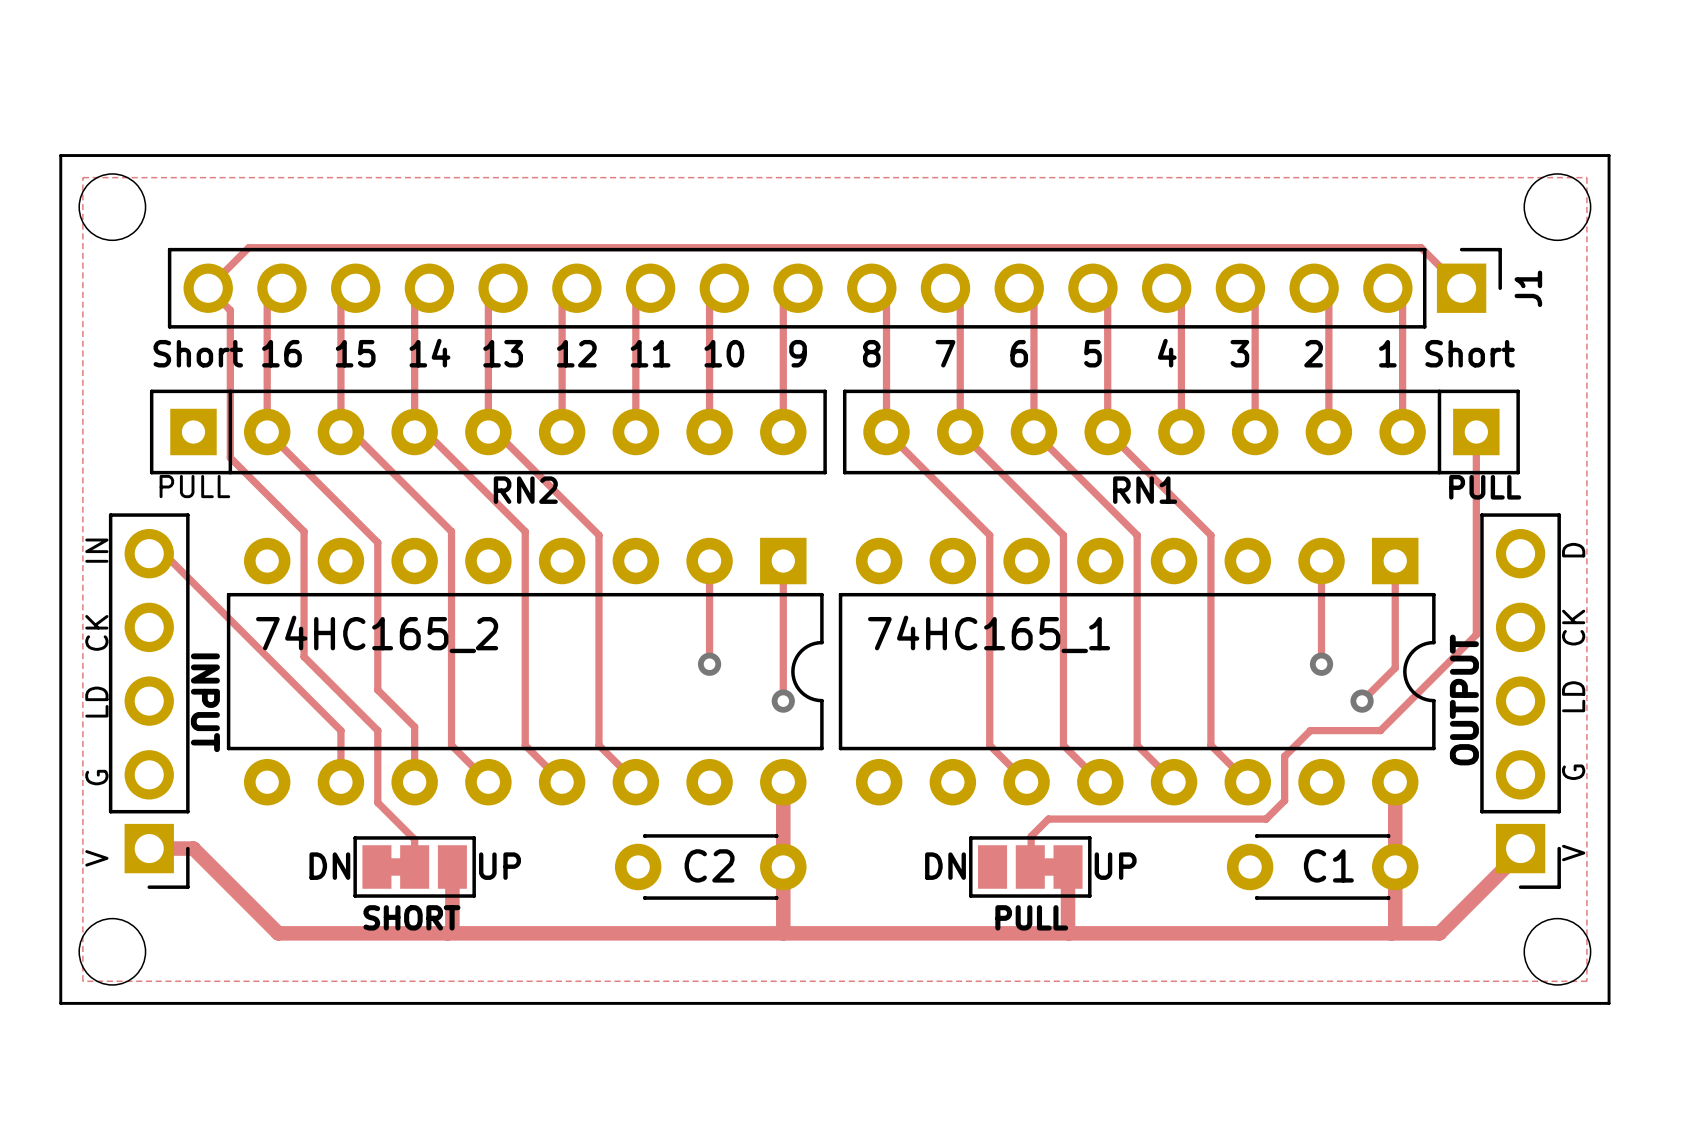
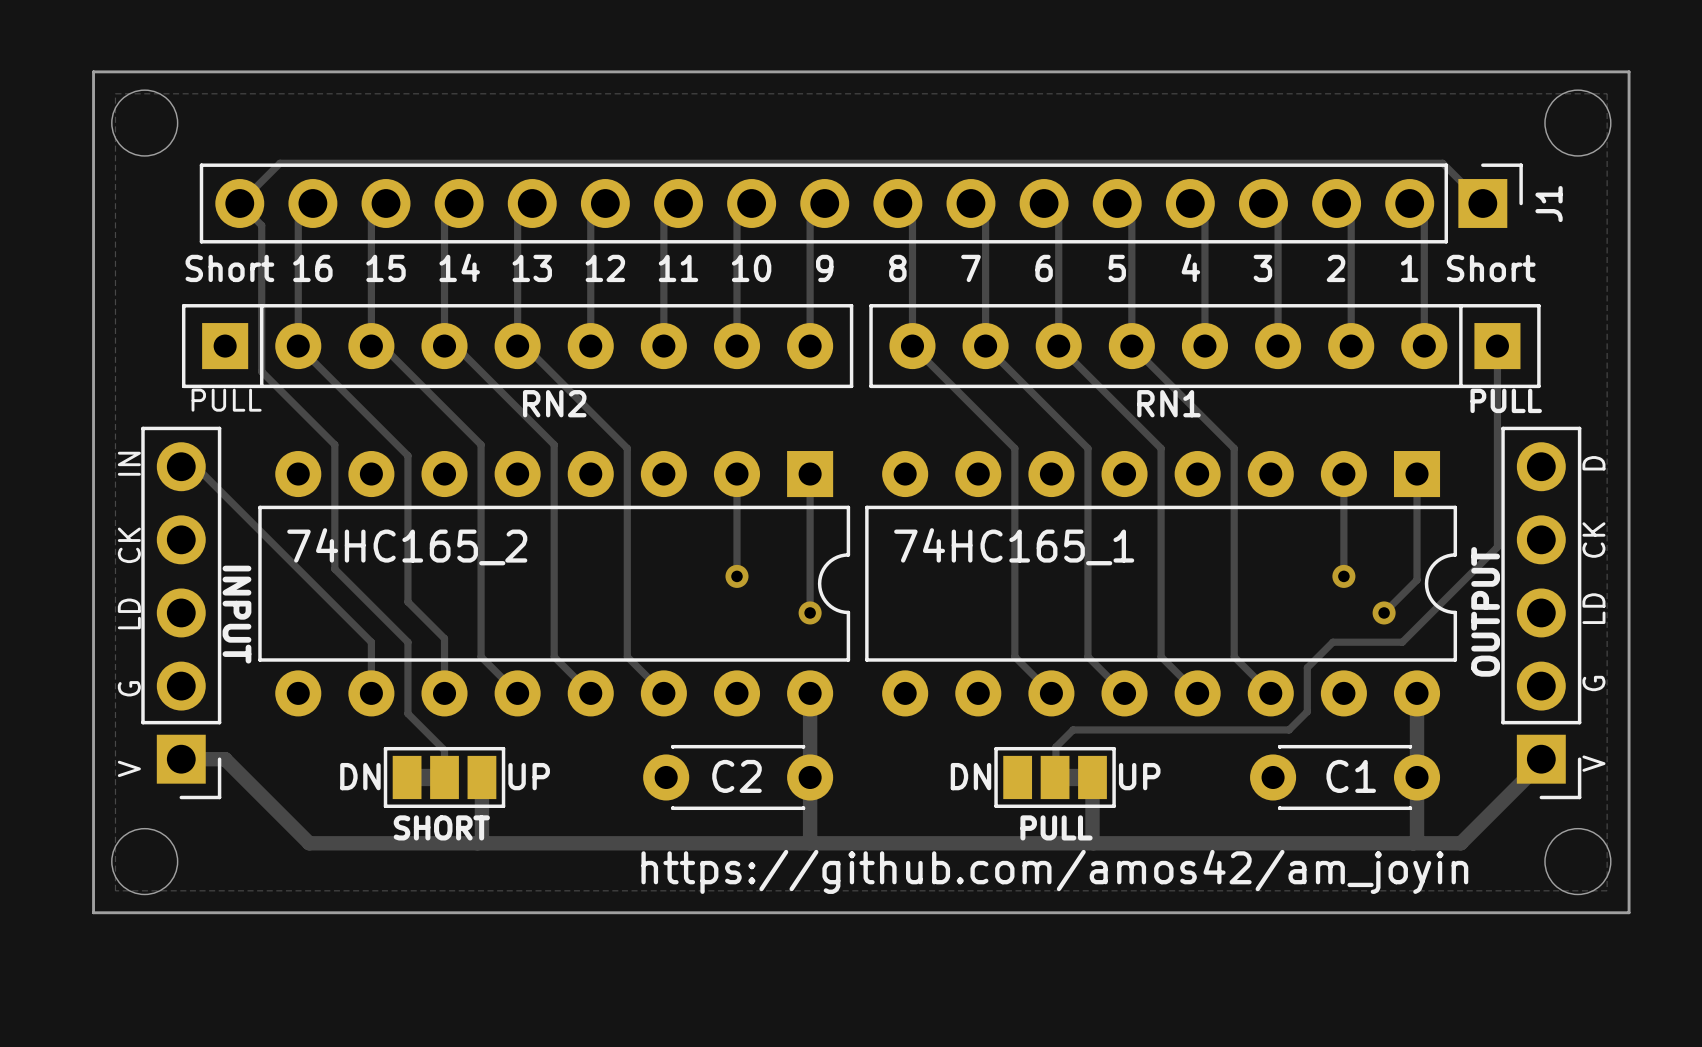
text: none -> https://github.com/amos42/am_joyin (1054, 871)

